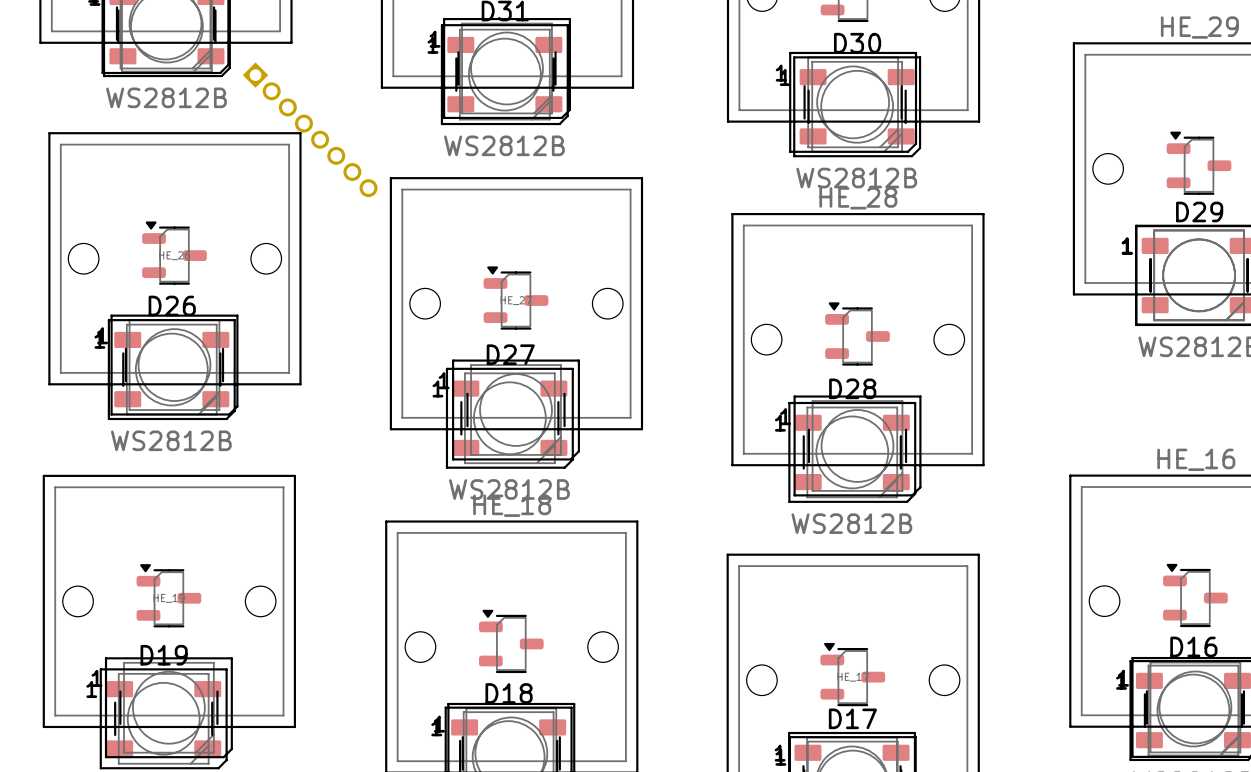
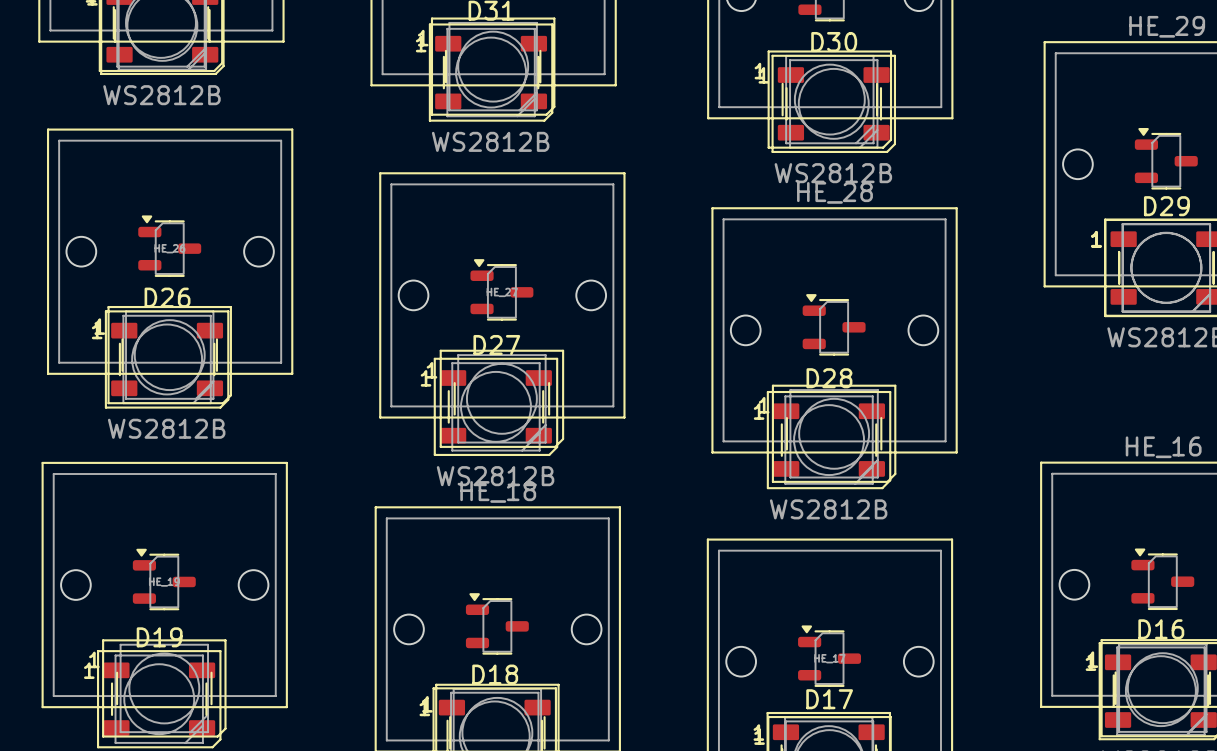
part: (310, 129) -> none

